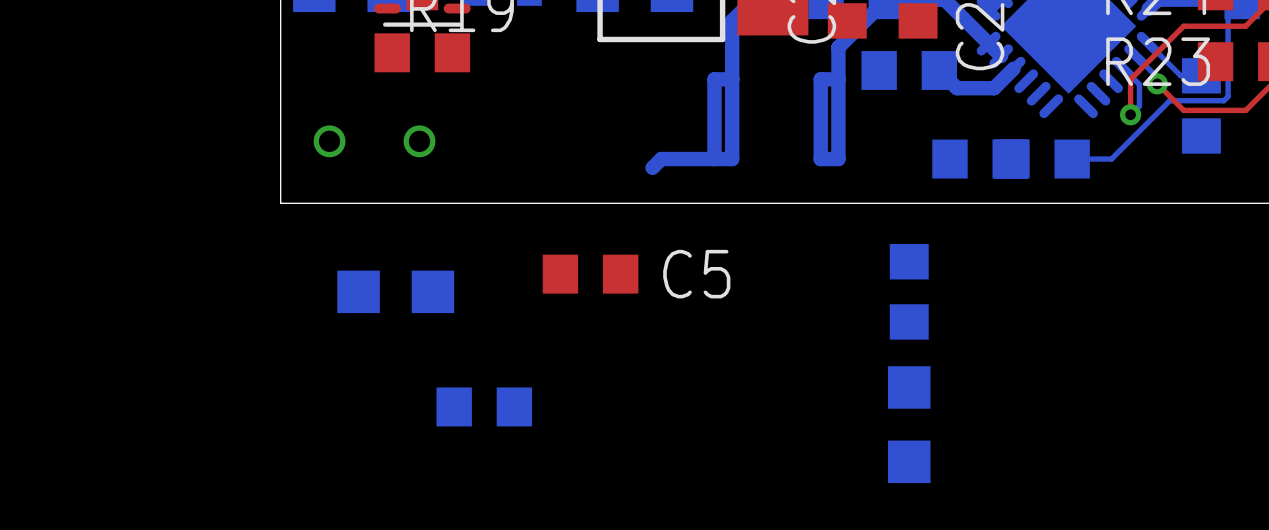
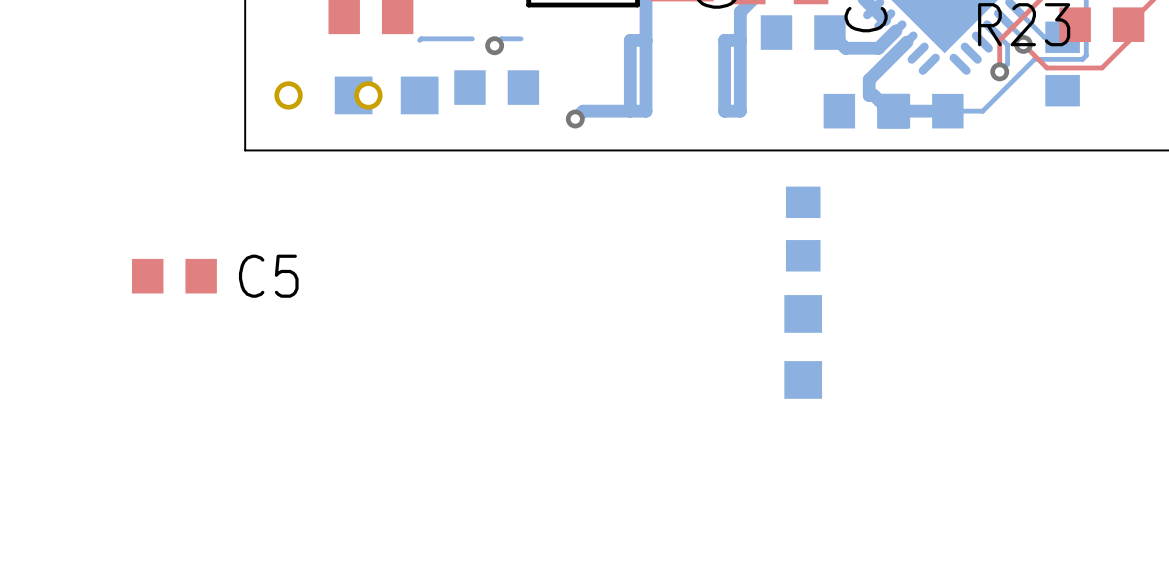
bottom track: none -> (472, 38) (421, 38) (419, 40)
bottom track: none -> (521, 38) (501, 38) (494, 45)
bottom track: none -> (907, 42) (869, 79) (869, 95) (873, 95) (889, 111) (947, 111)
via: none -> (494, 45)
part: none -> (496, 87)
part: none -> (386, 95)
via: none -> (575, 119)
C5 position: (590, 274) -> (174, 276)
part: (395, 291) -> none
part: (484, 406) -> none

